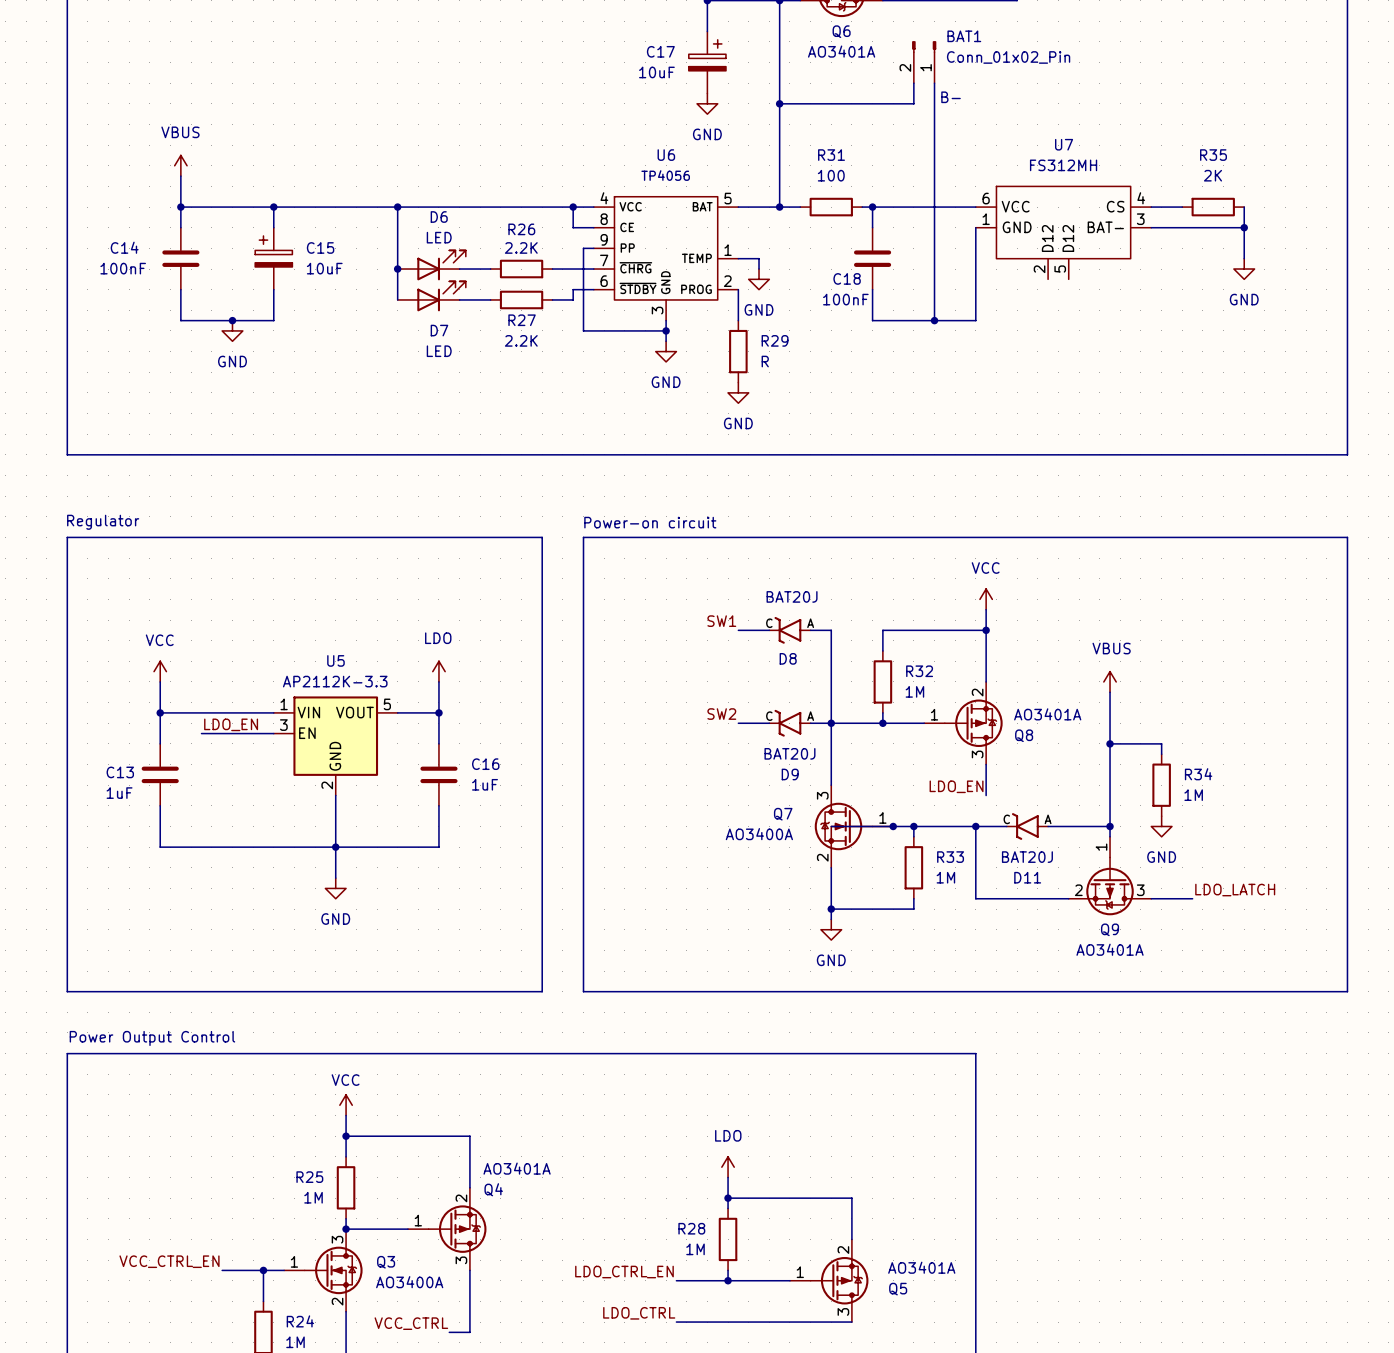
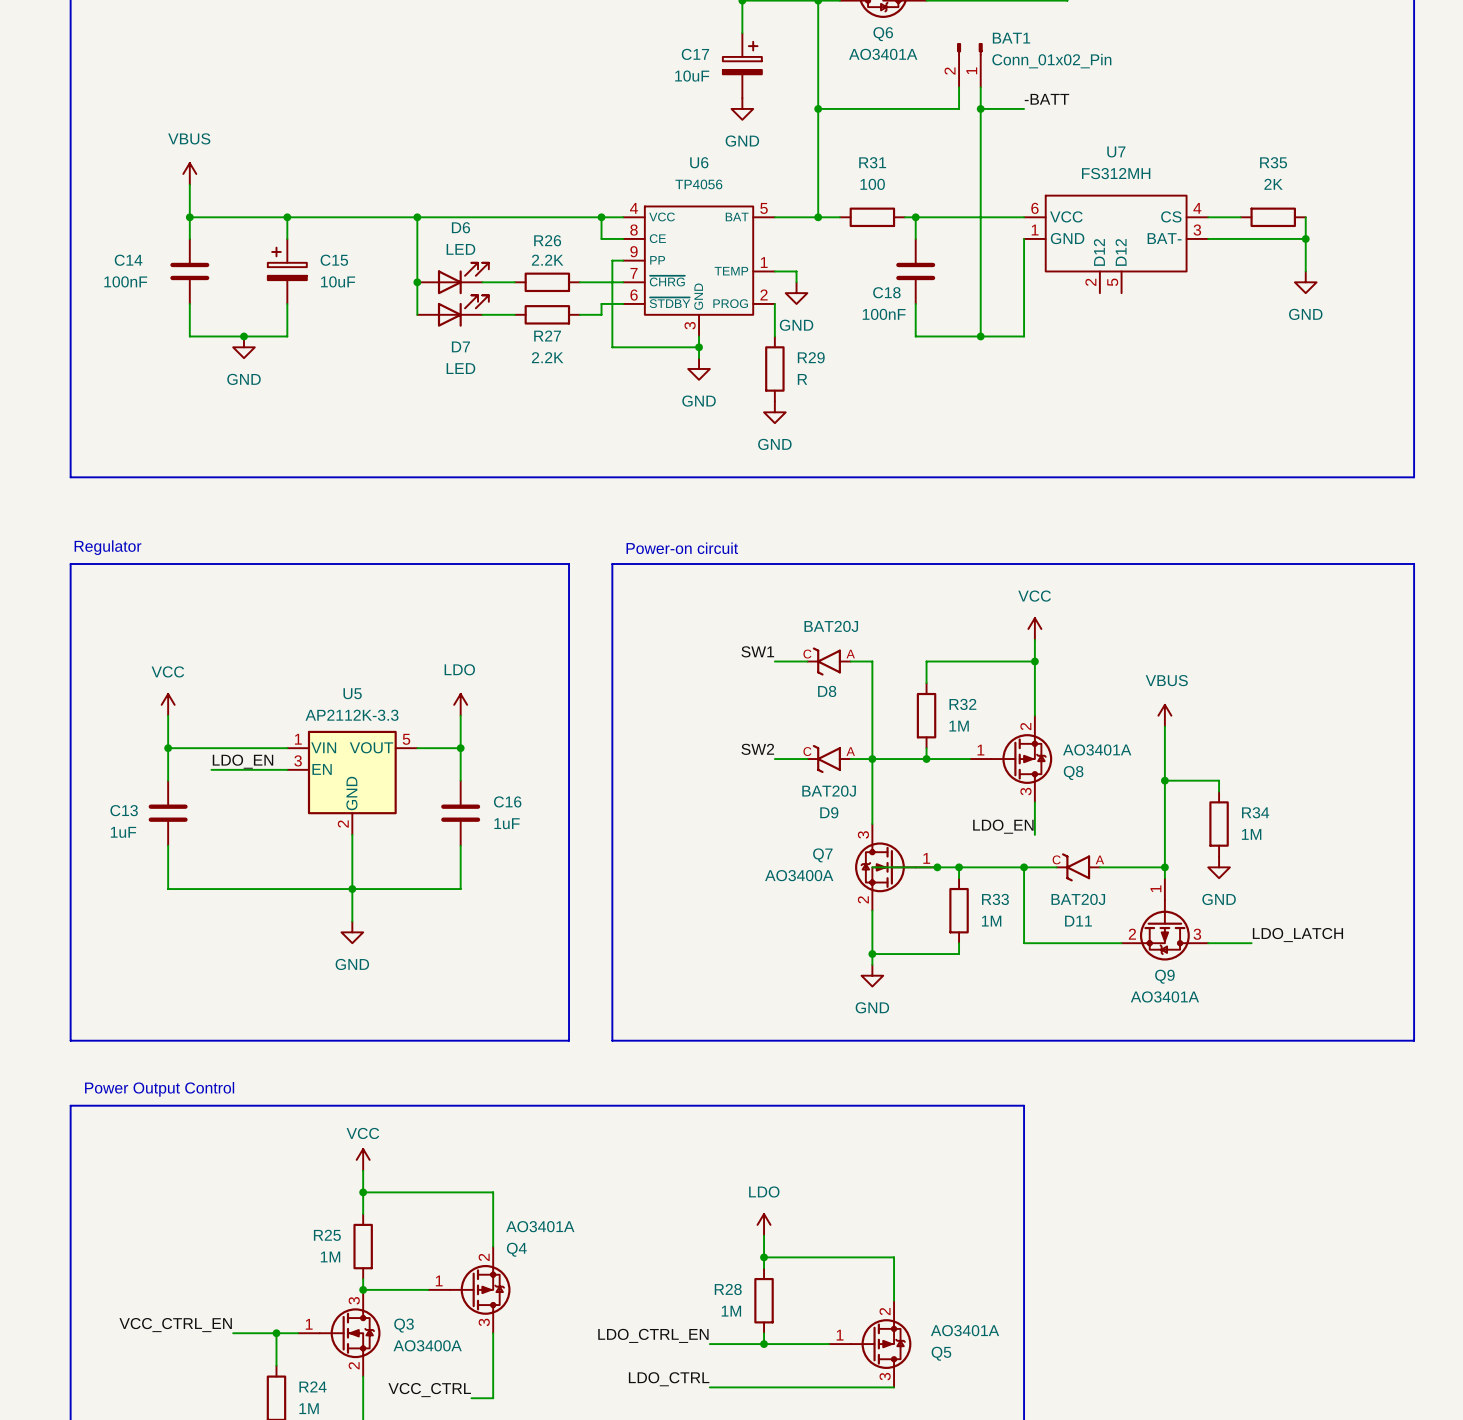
label: none -> -BATT (1046, 99)
text: B- (951, 97) -> none
wire: none -> (980, 108) (1024, 108)
junction: none -> (980, 108)

